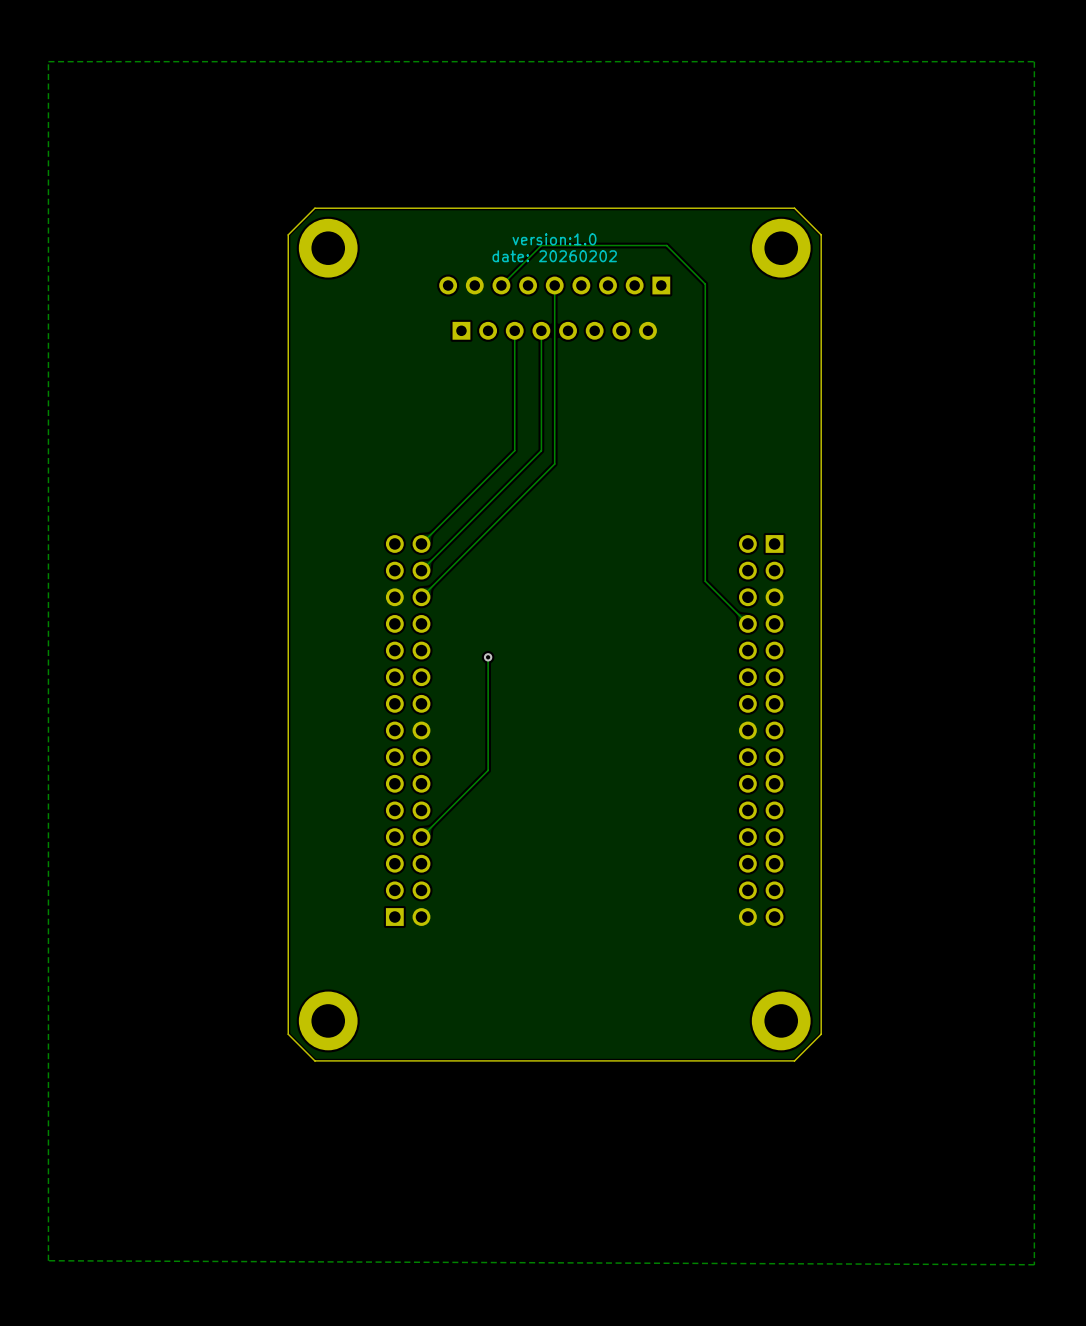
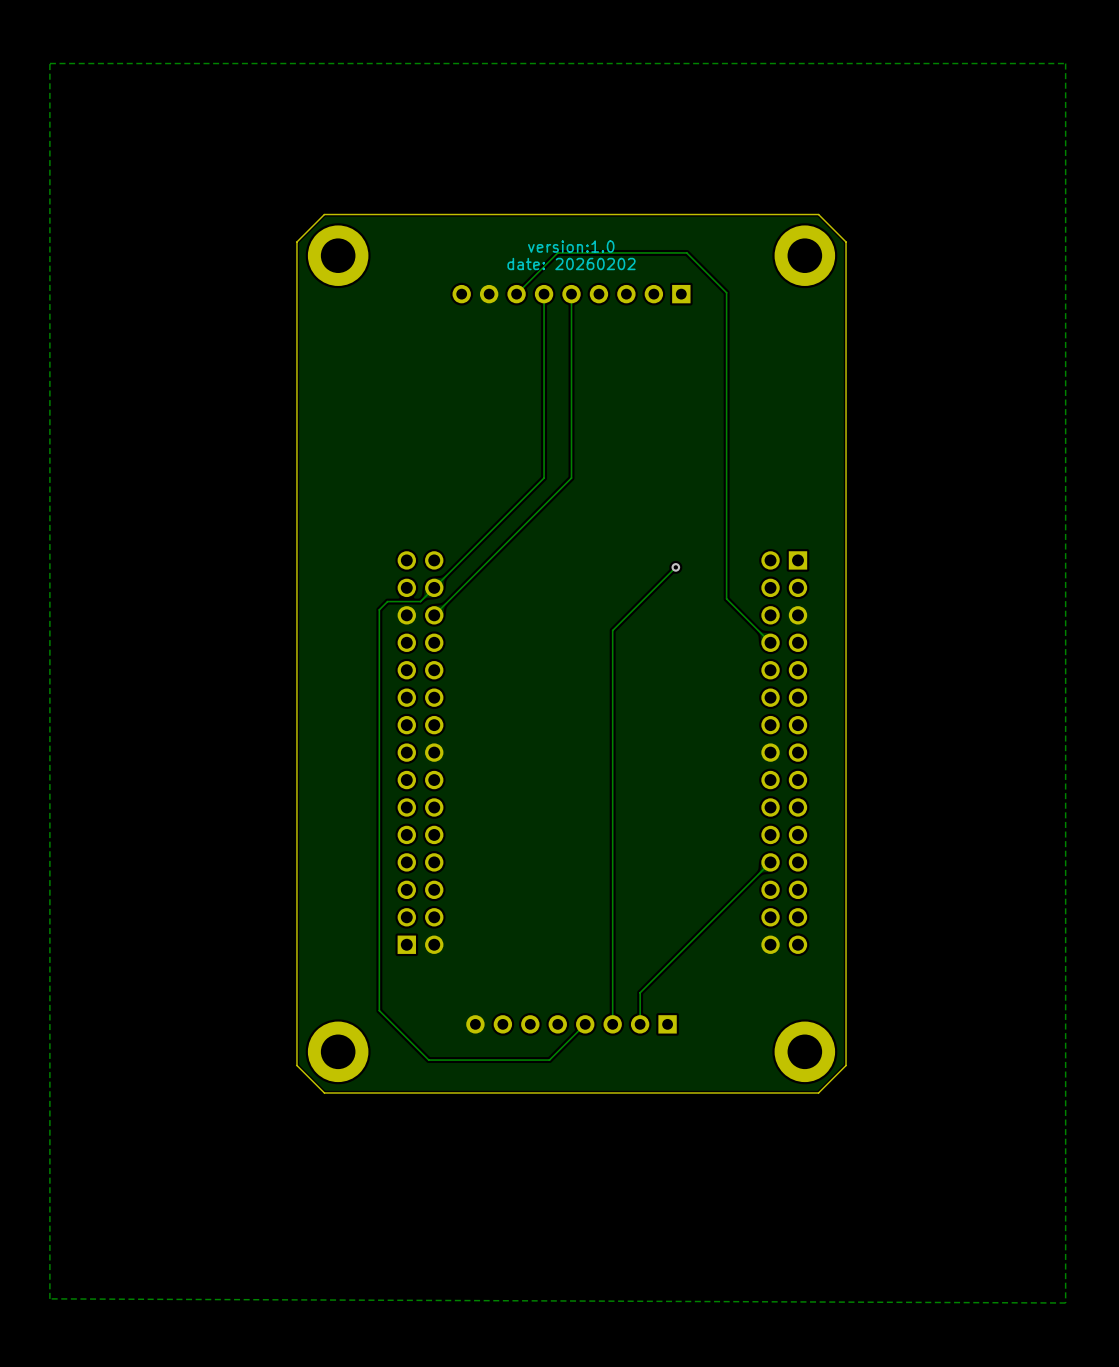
track: (514, 330) (514, 450) (421, 543) -> none
track: (541, 330) (541, 450) (528, 464) -> (544, 294) (544, 478)
part: (554, 330) -> none
track: none -> (675, 567) (612, 630) (612, 1024)
via: none -> (675, 567)
track: none -> (434, 587) (420, 601) (387, 601) (379, 609) (379, 1010) (428, 1060) (549, 1060) (585, 1024)
track: (488, 657) (488, 770) (421, 837) -> none
via: (488, 657) -> none
track: none -> (770, 862) (640, 992) (640, 1024)
part: none -> (571, 1024)

